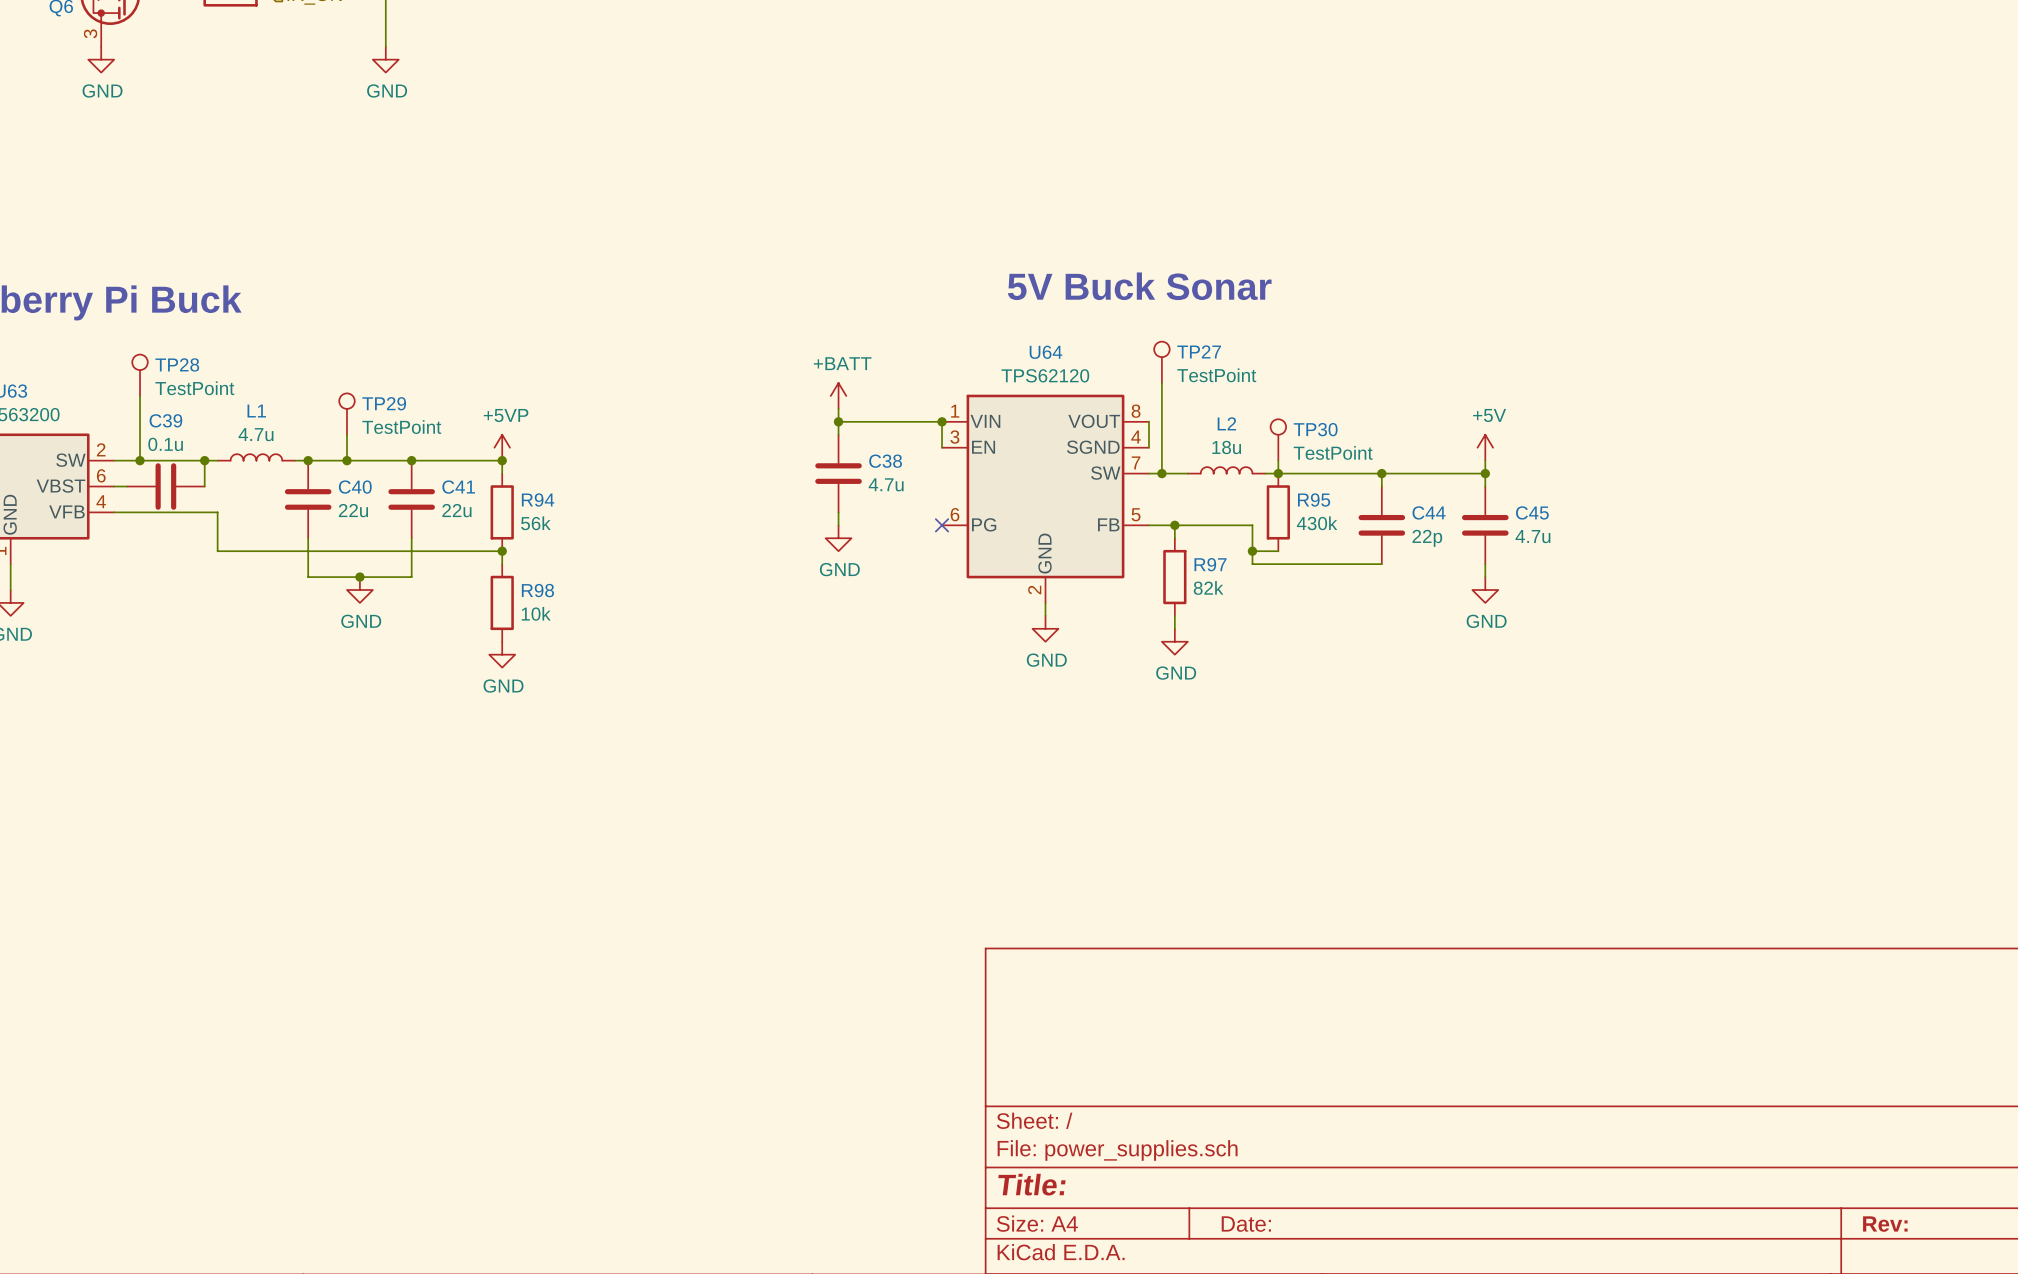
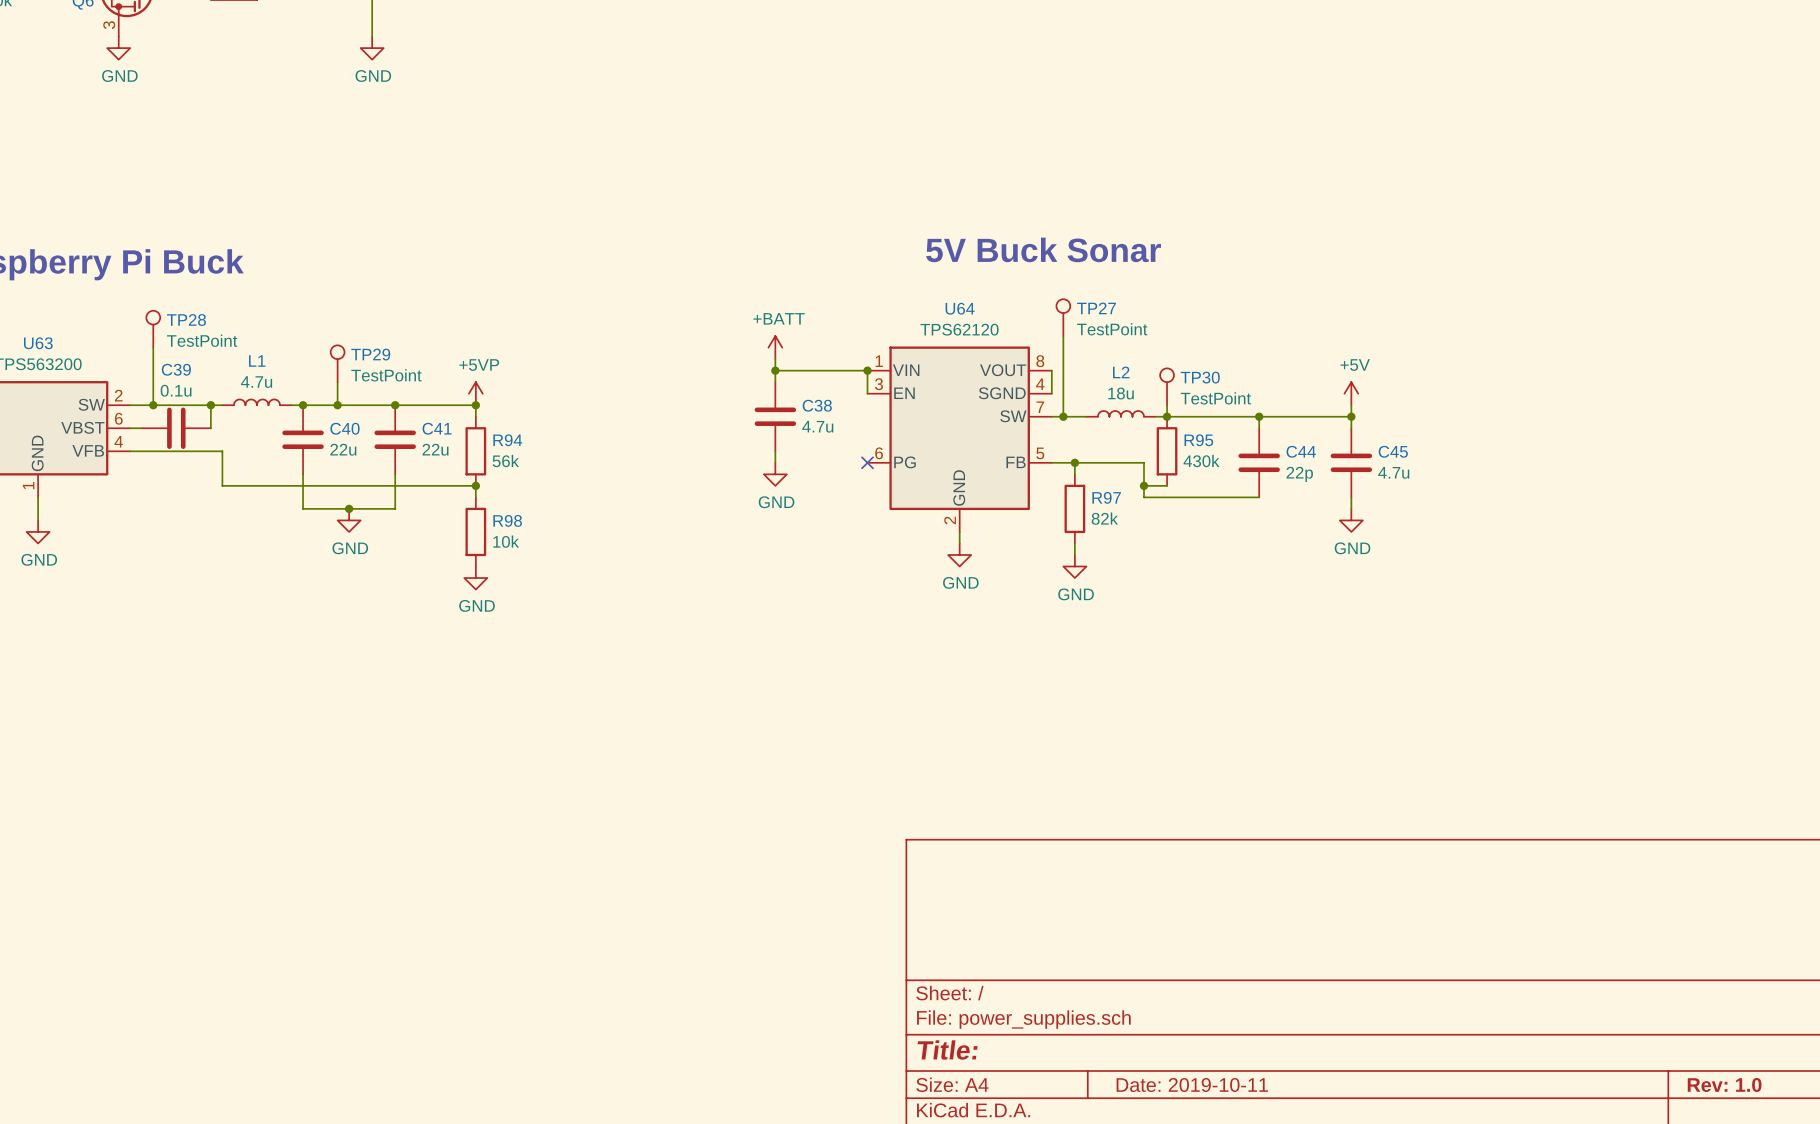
title block: Date: (1246, 1224) -> Date: 2019-10-11 (1192, 1085)
title block: Rev: (1885, 1224) -> Rev: 1.0 (1724, 1085)

